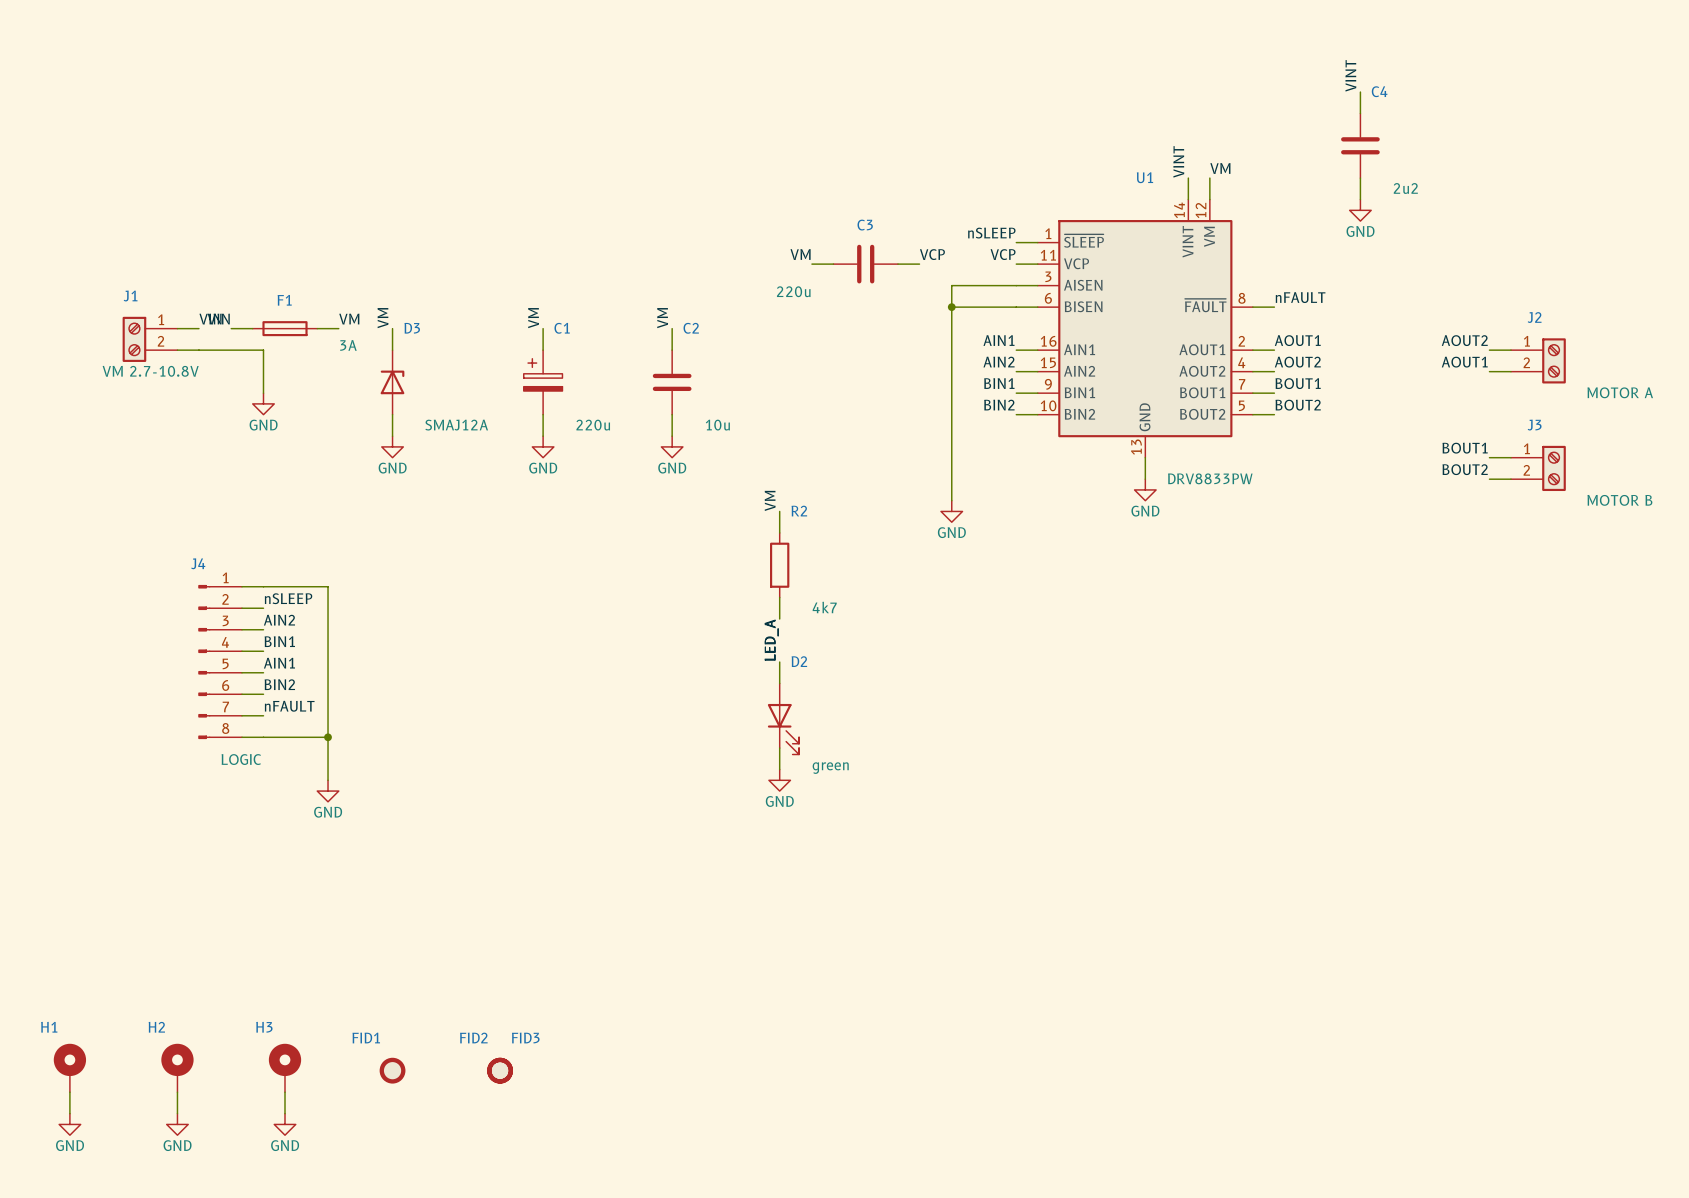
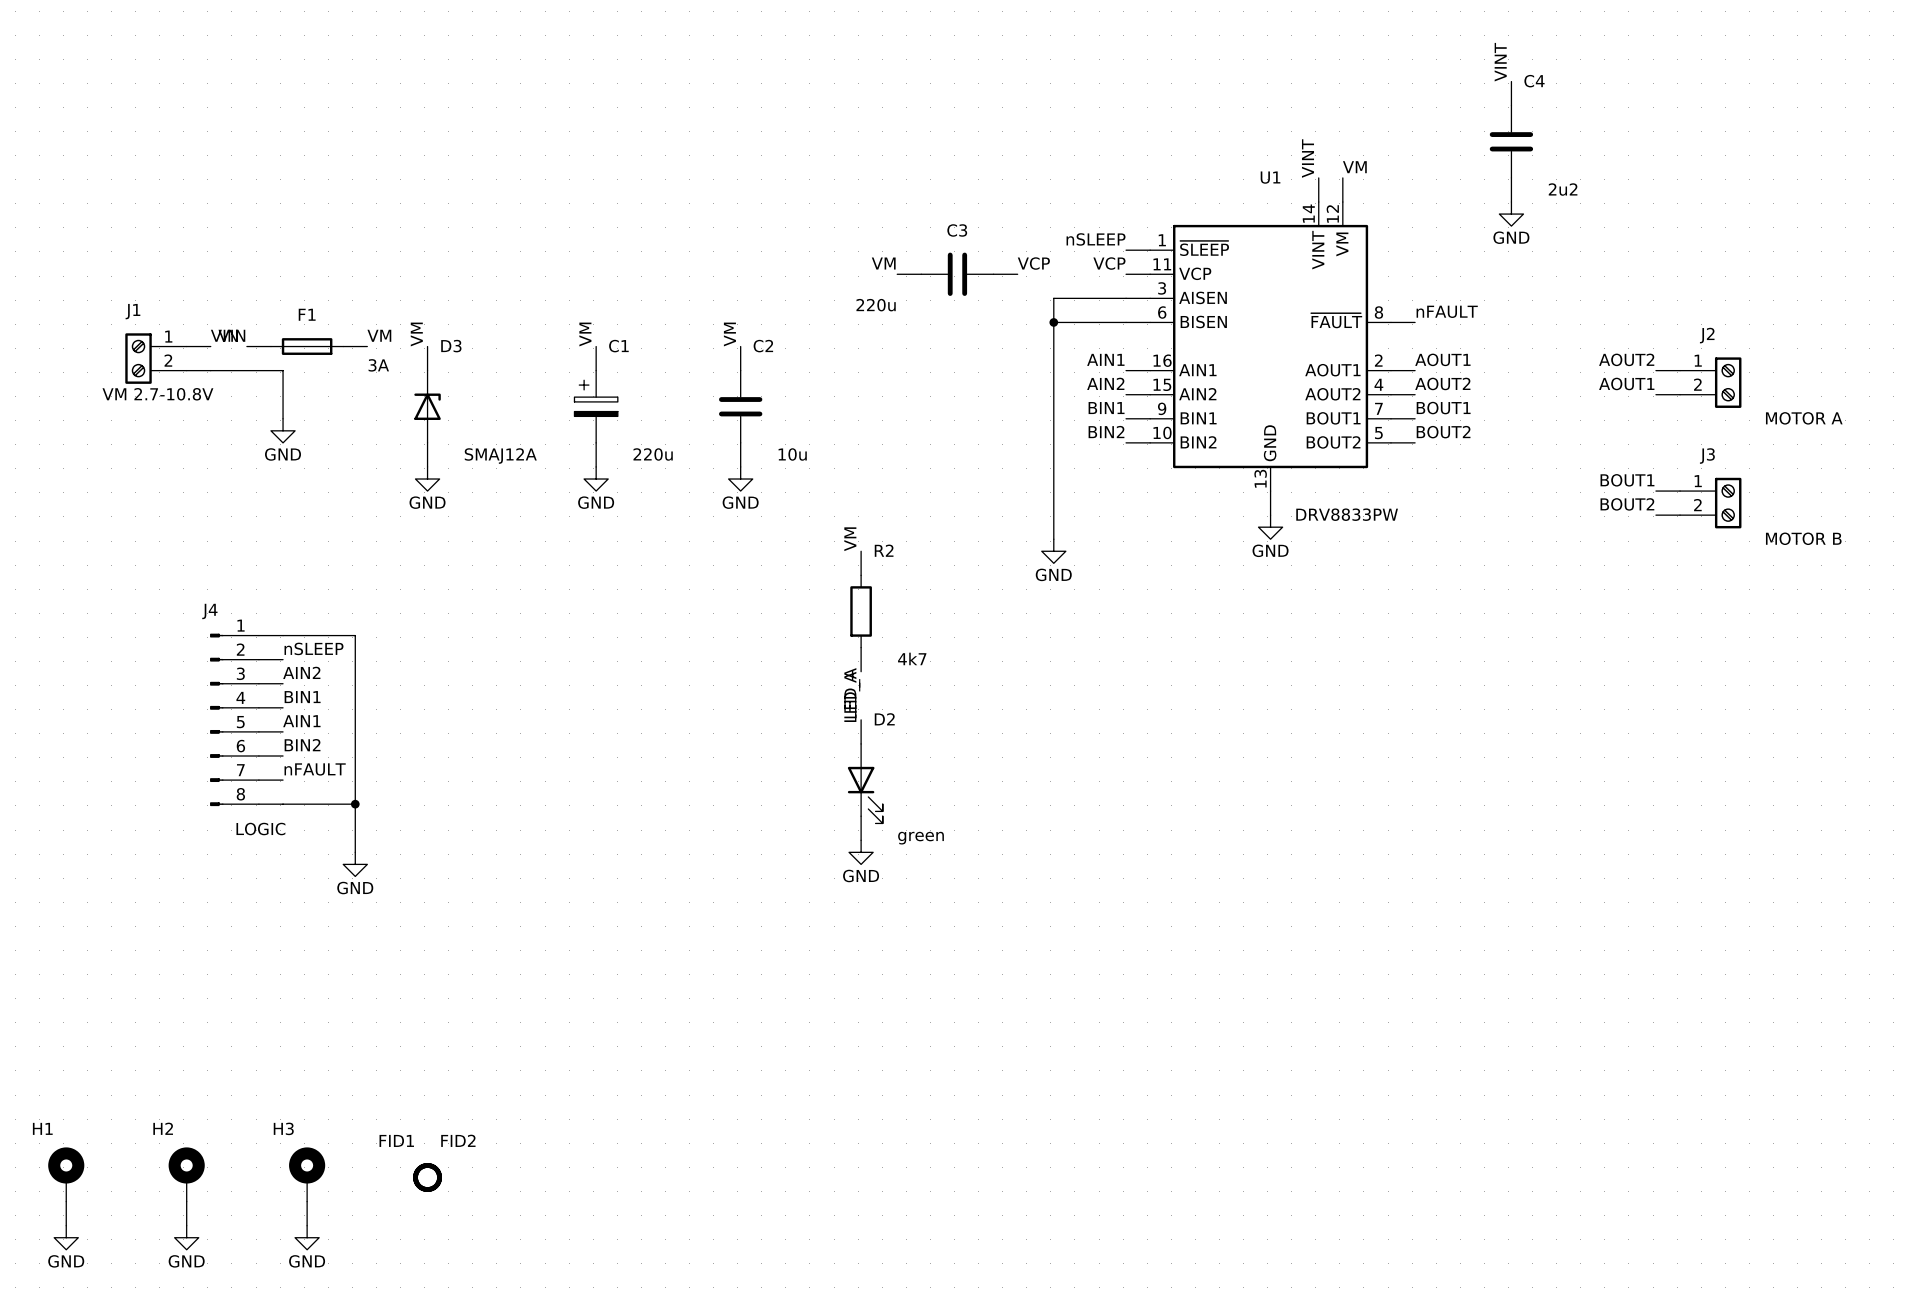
FID2 name position: FID2 (473, 1038) -> FID2 (458, 1140)
FID2 position: (500, 1070) -> (427, 1177)
FID3: (500, 1070) -> none

